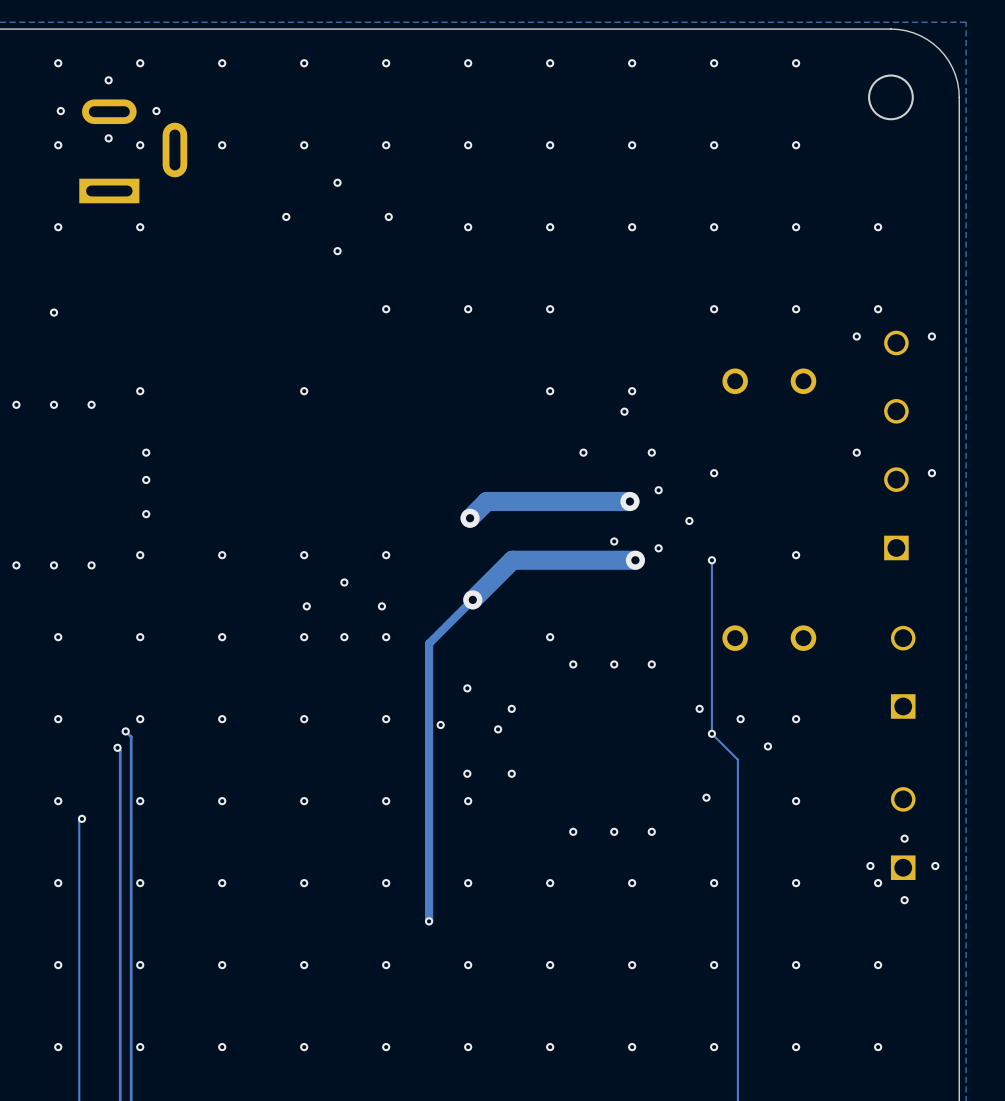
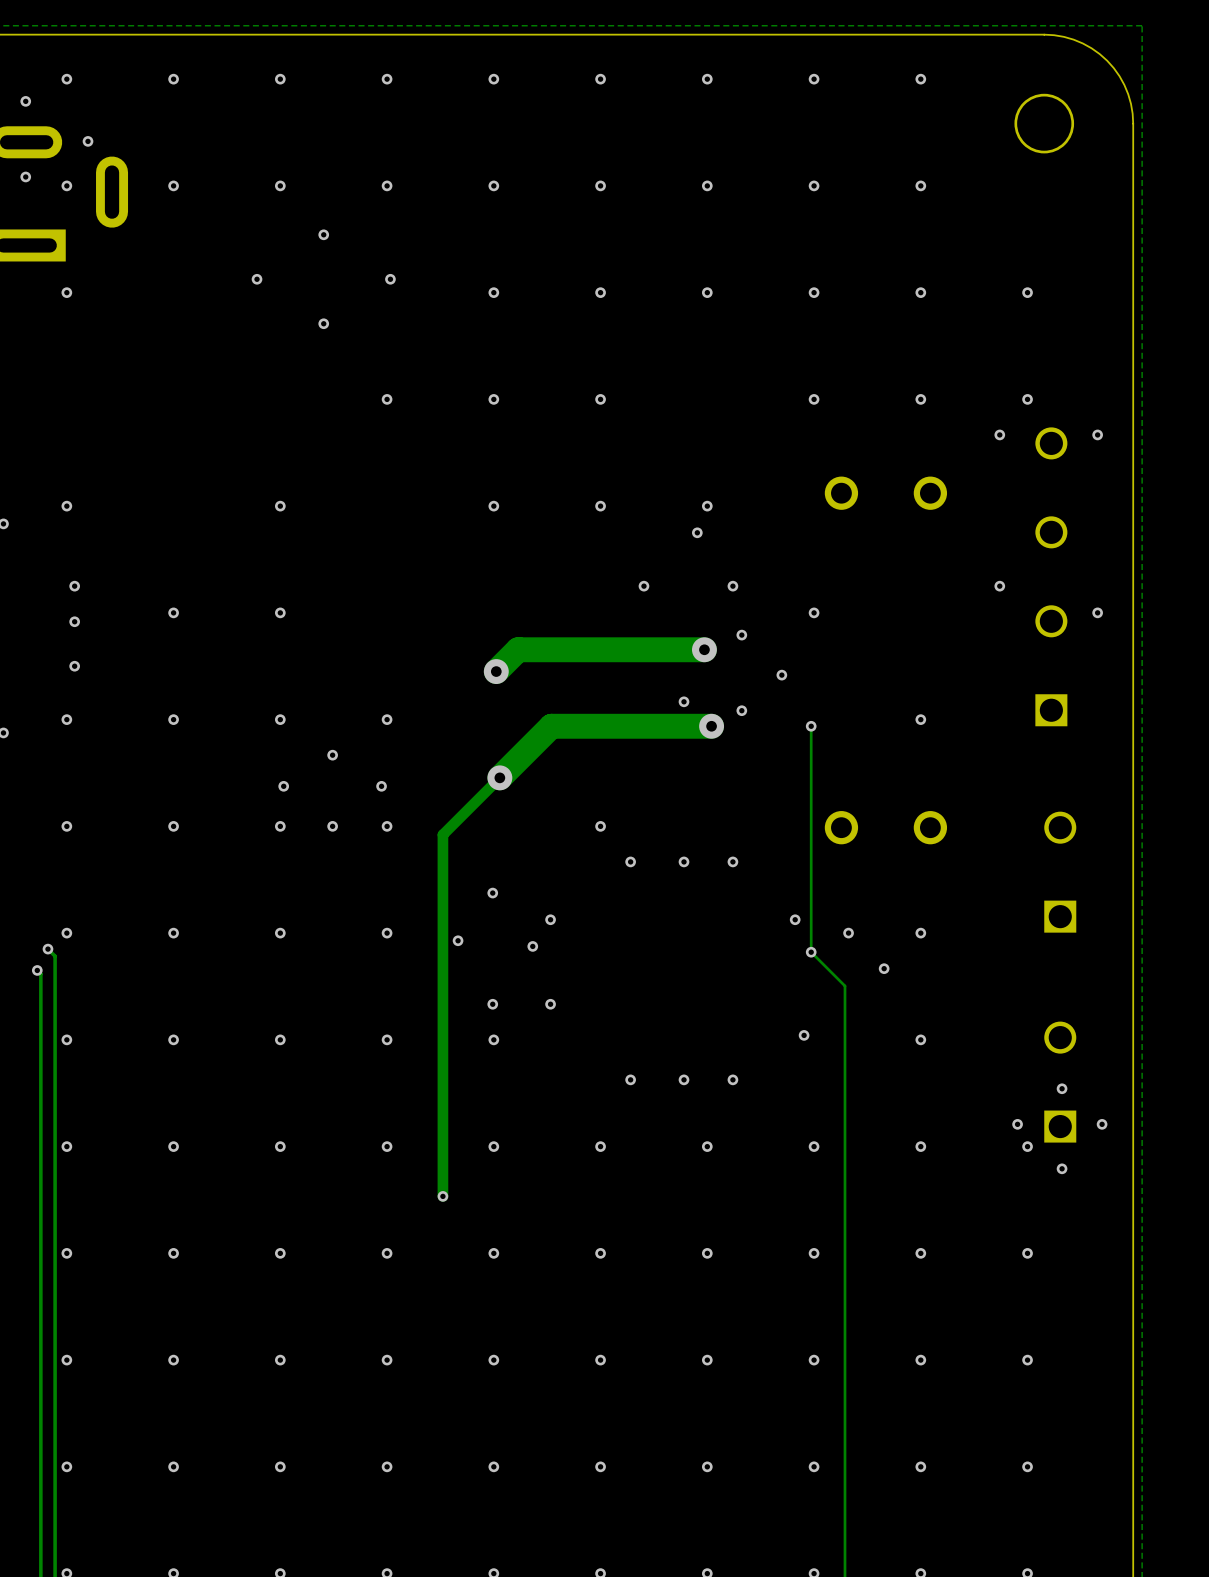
via: none -> (493, 506)
via: none -> (173, 612)
via: none -> (280, 612)

